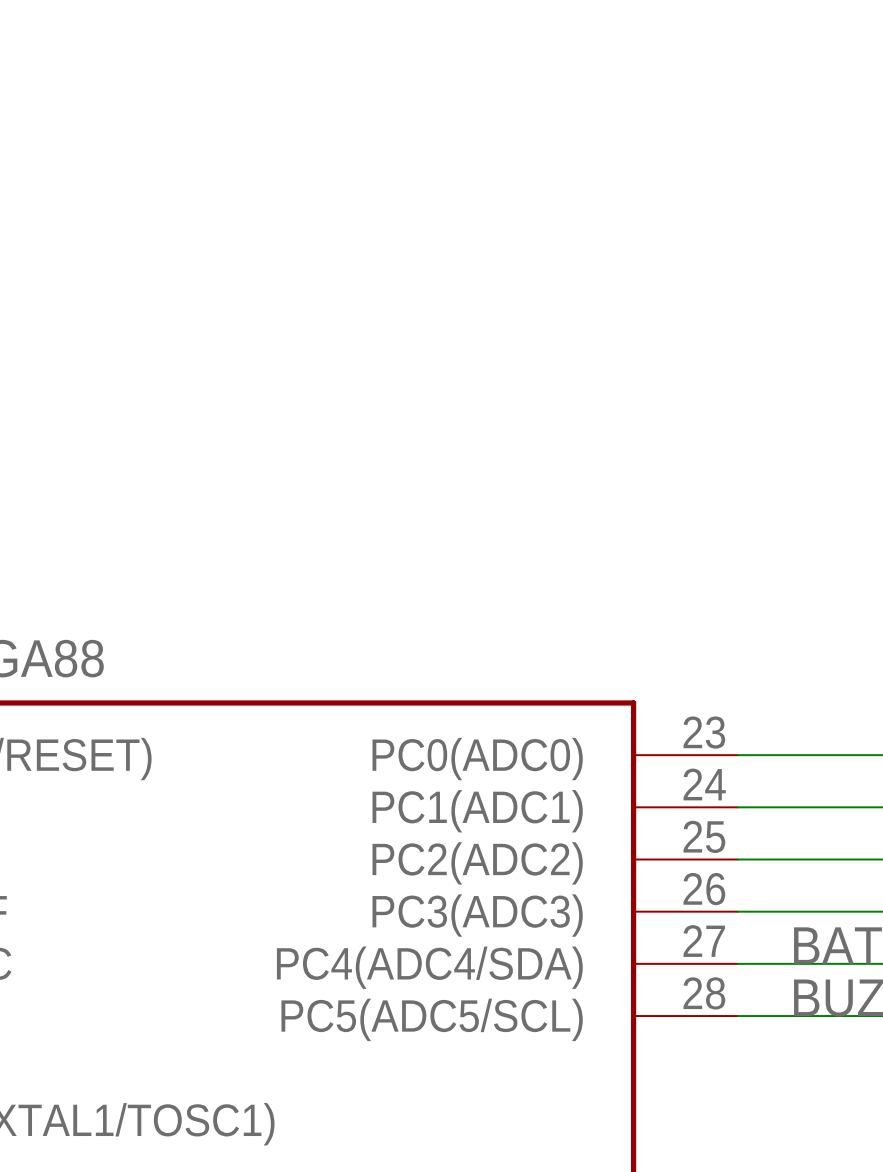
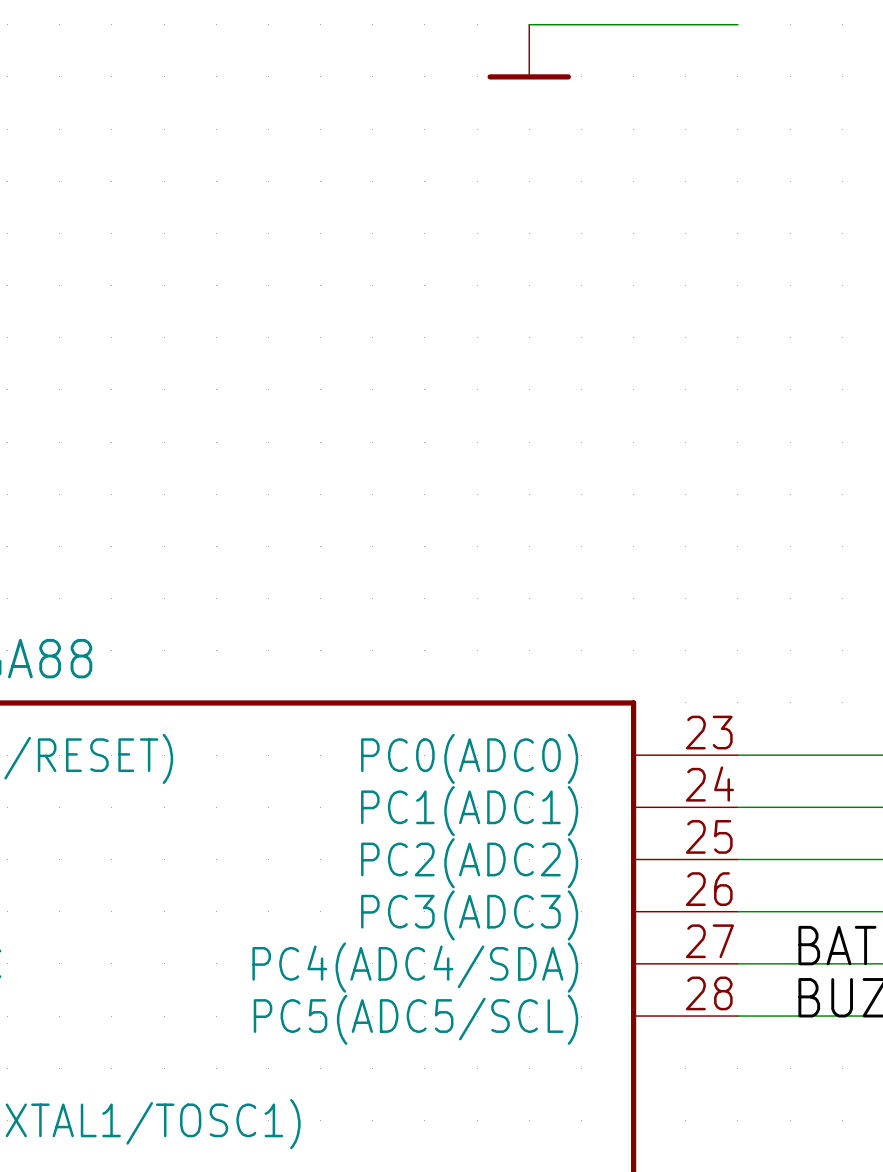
wire: none -> (529, 24) (737, 24)
power symbol: none -> (529, 52)

